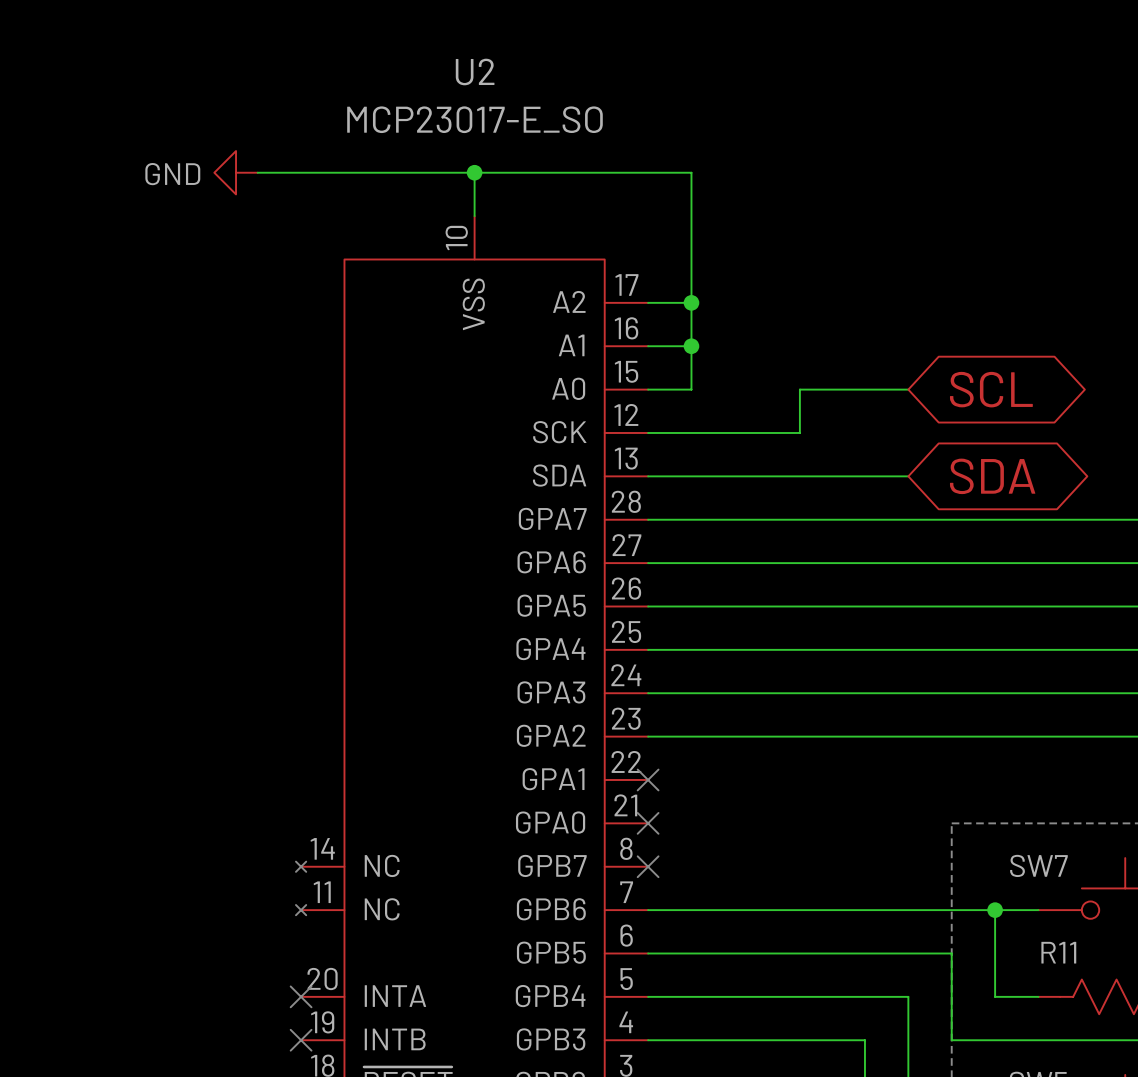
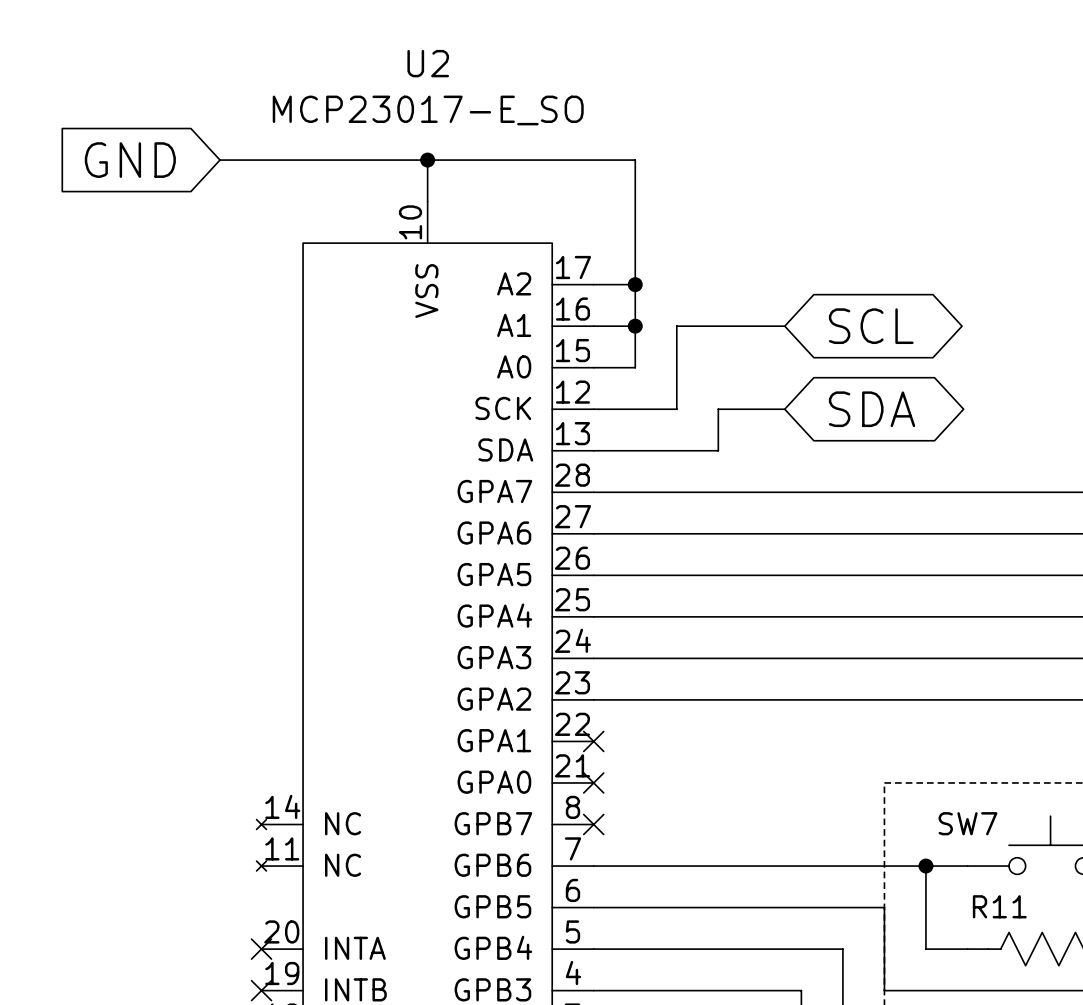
global label: none -> GND (130, 160)
power symbol: GND (236, 172) -> none
wire: none -> (784, 326) (676, 326) (676, 409)
wire: (908, 389) (799, 389) (799, 432) -> (784, 409) (739, 409)
global label position: SCL (991, 389) -> SCL (871, 326)
wire: (734, 432) (778, 432) -> (718, 450) (718, 409)
wire: (778, 476) (908, 476) -> none
global label position: SDA (992, 476) -> SDA (872, 409)

